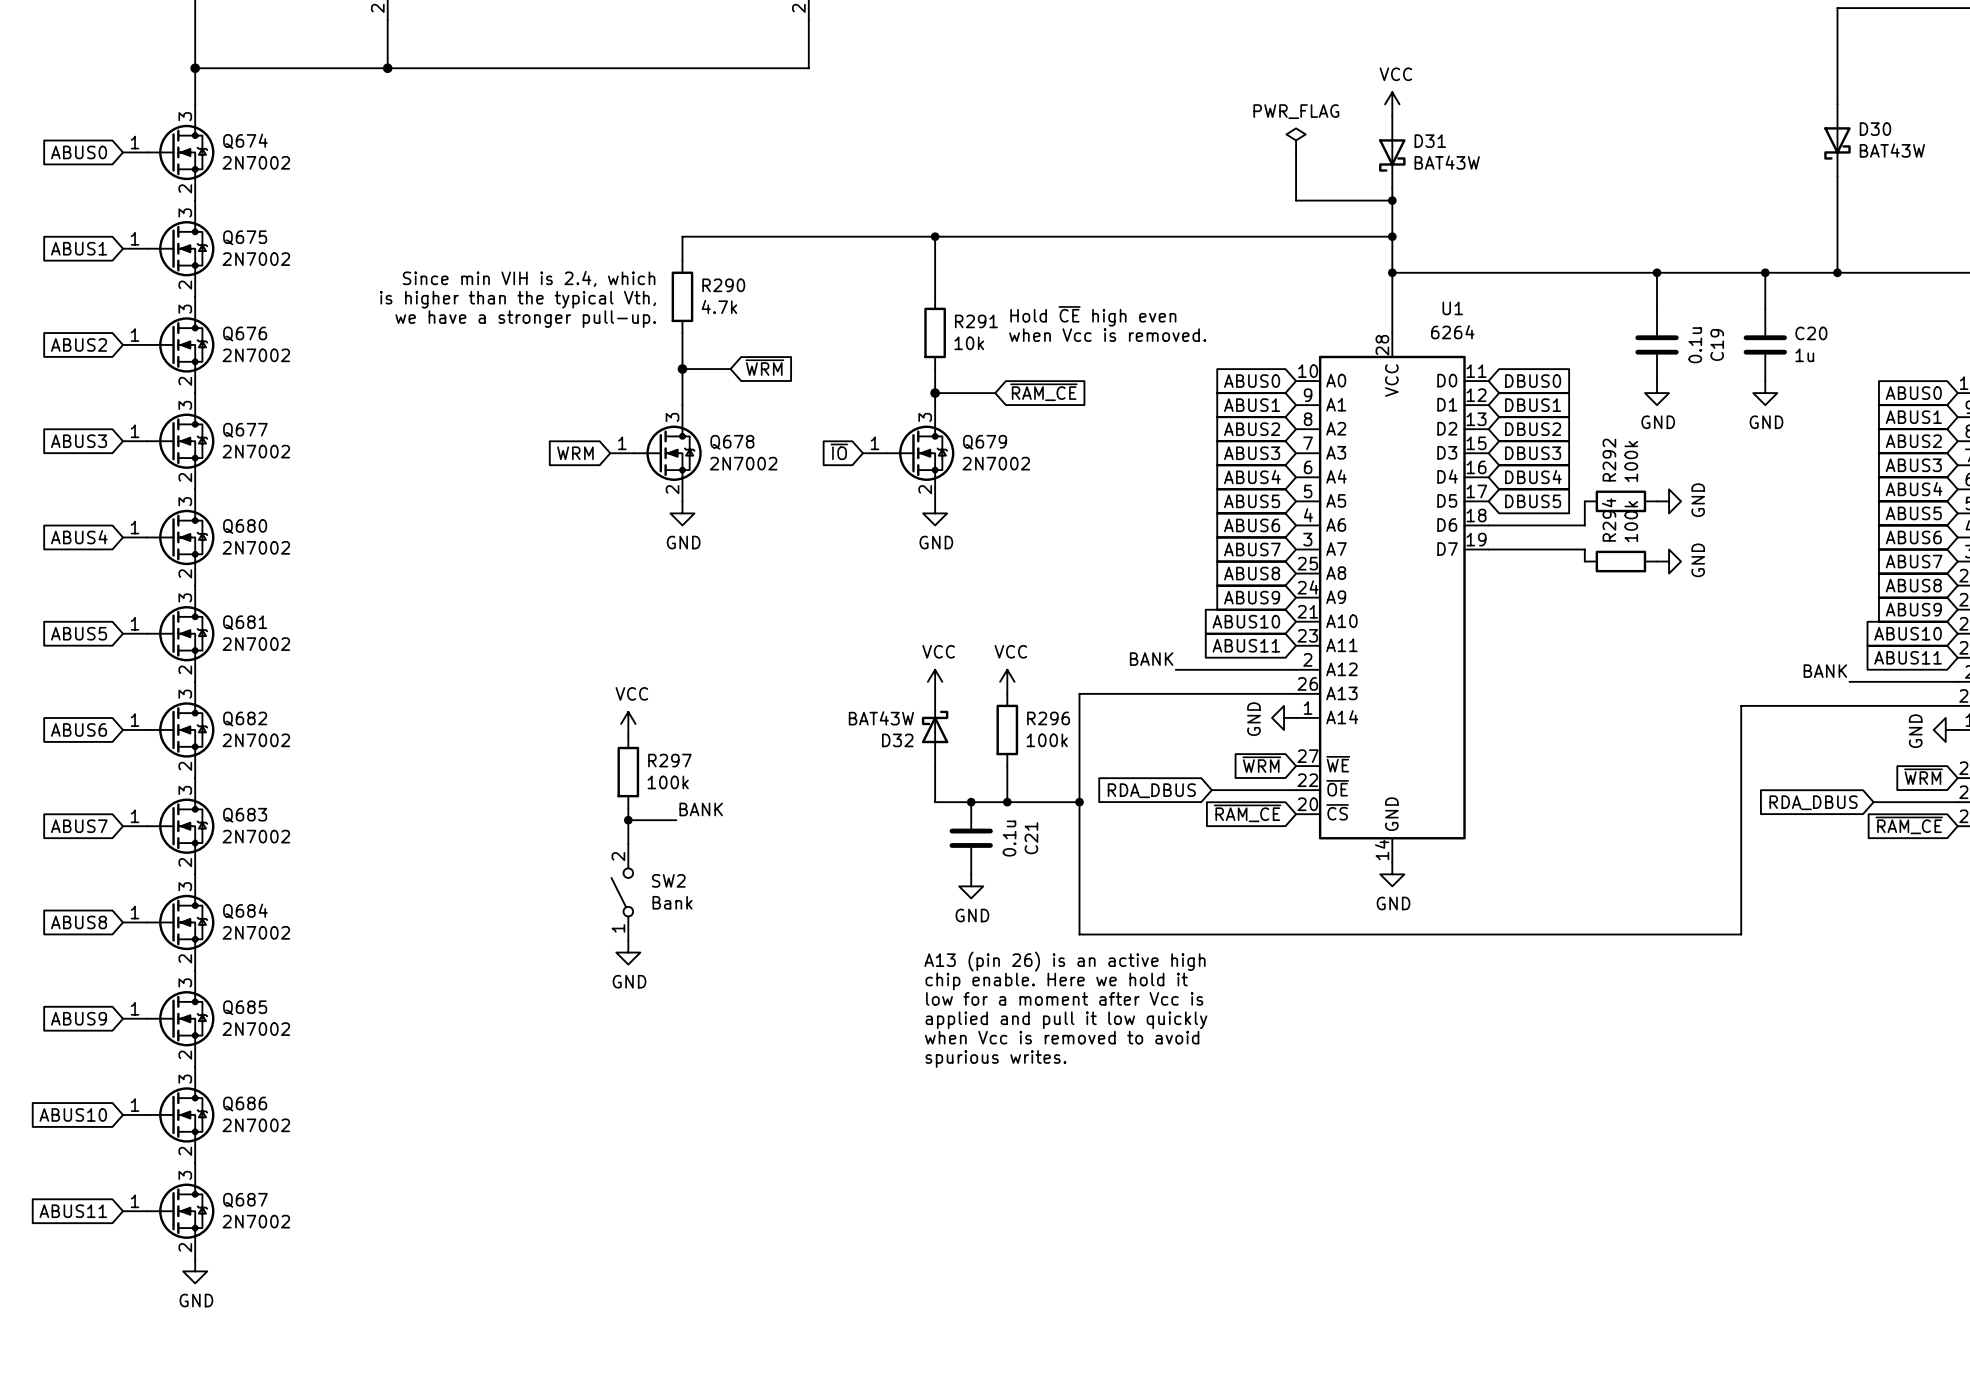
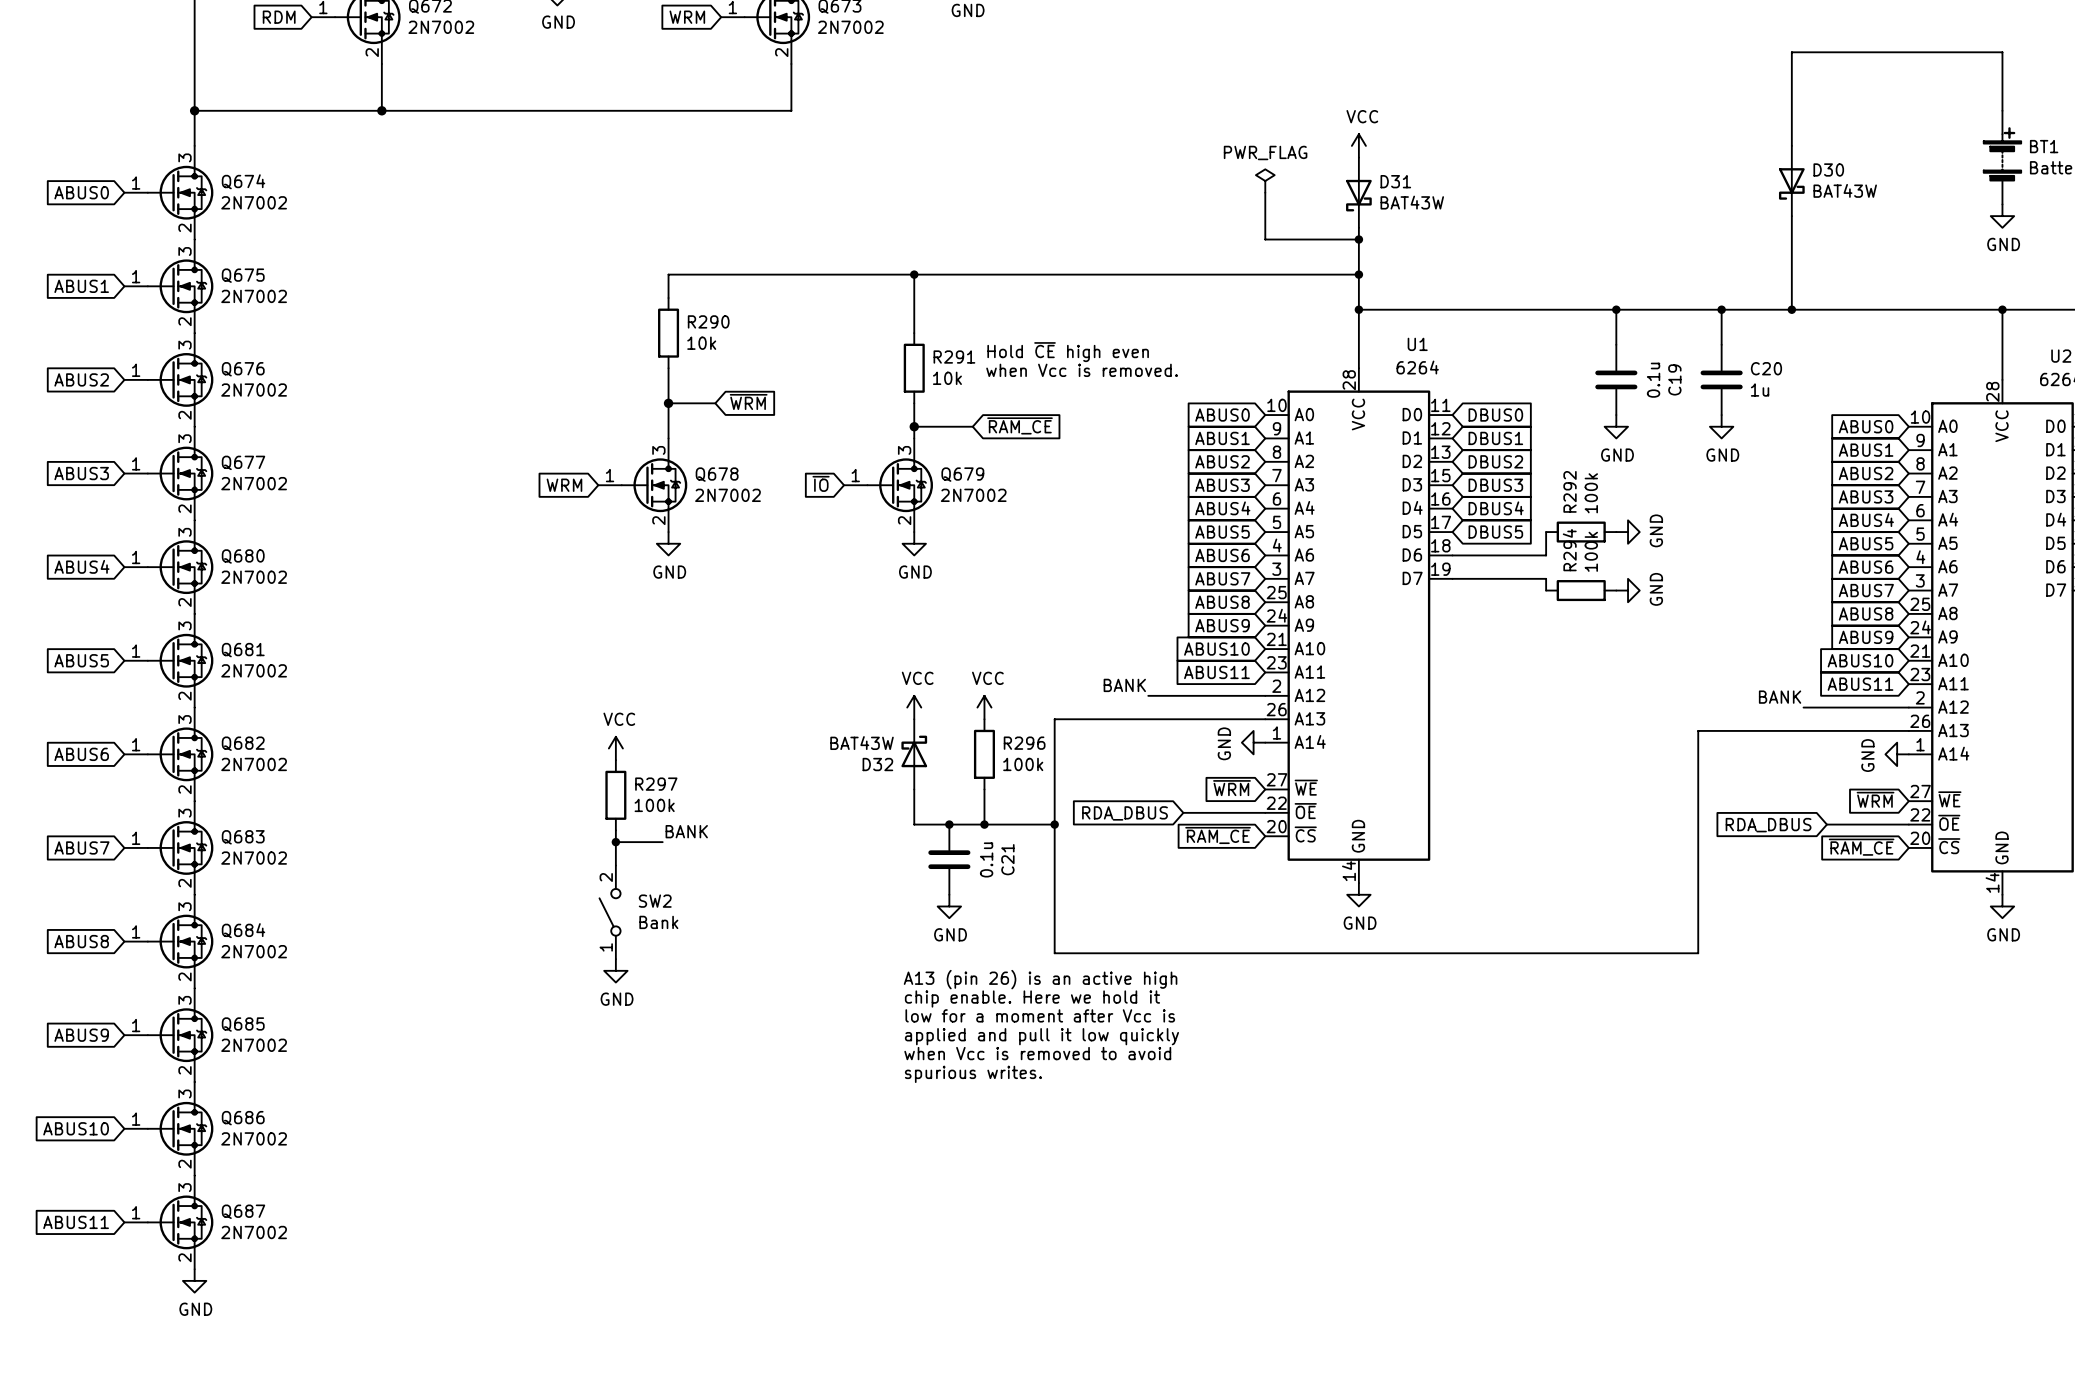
text: Since min VIH is 2.4, which (529, 278) -> none
text: is higher than the typical Vth, (517, 299) -> none
R290 value: 4.7k (719, 306) -> 10k (701, 343)
text: we have a stronger pull-up. (525, 319) -> none

